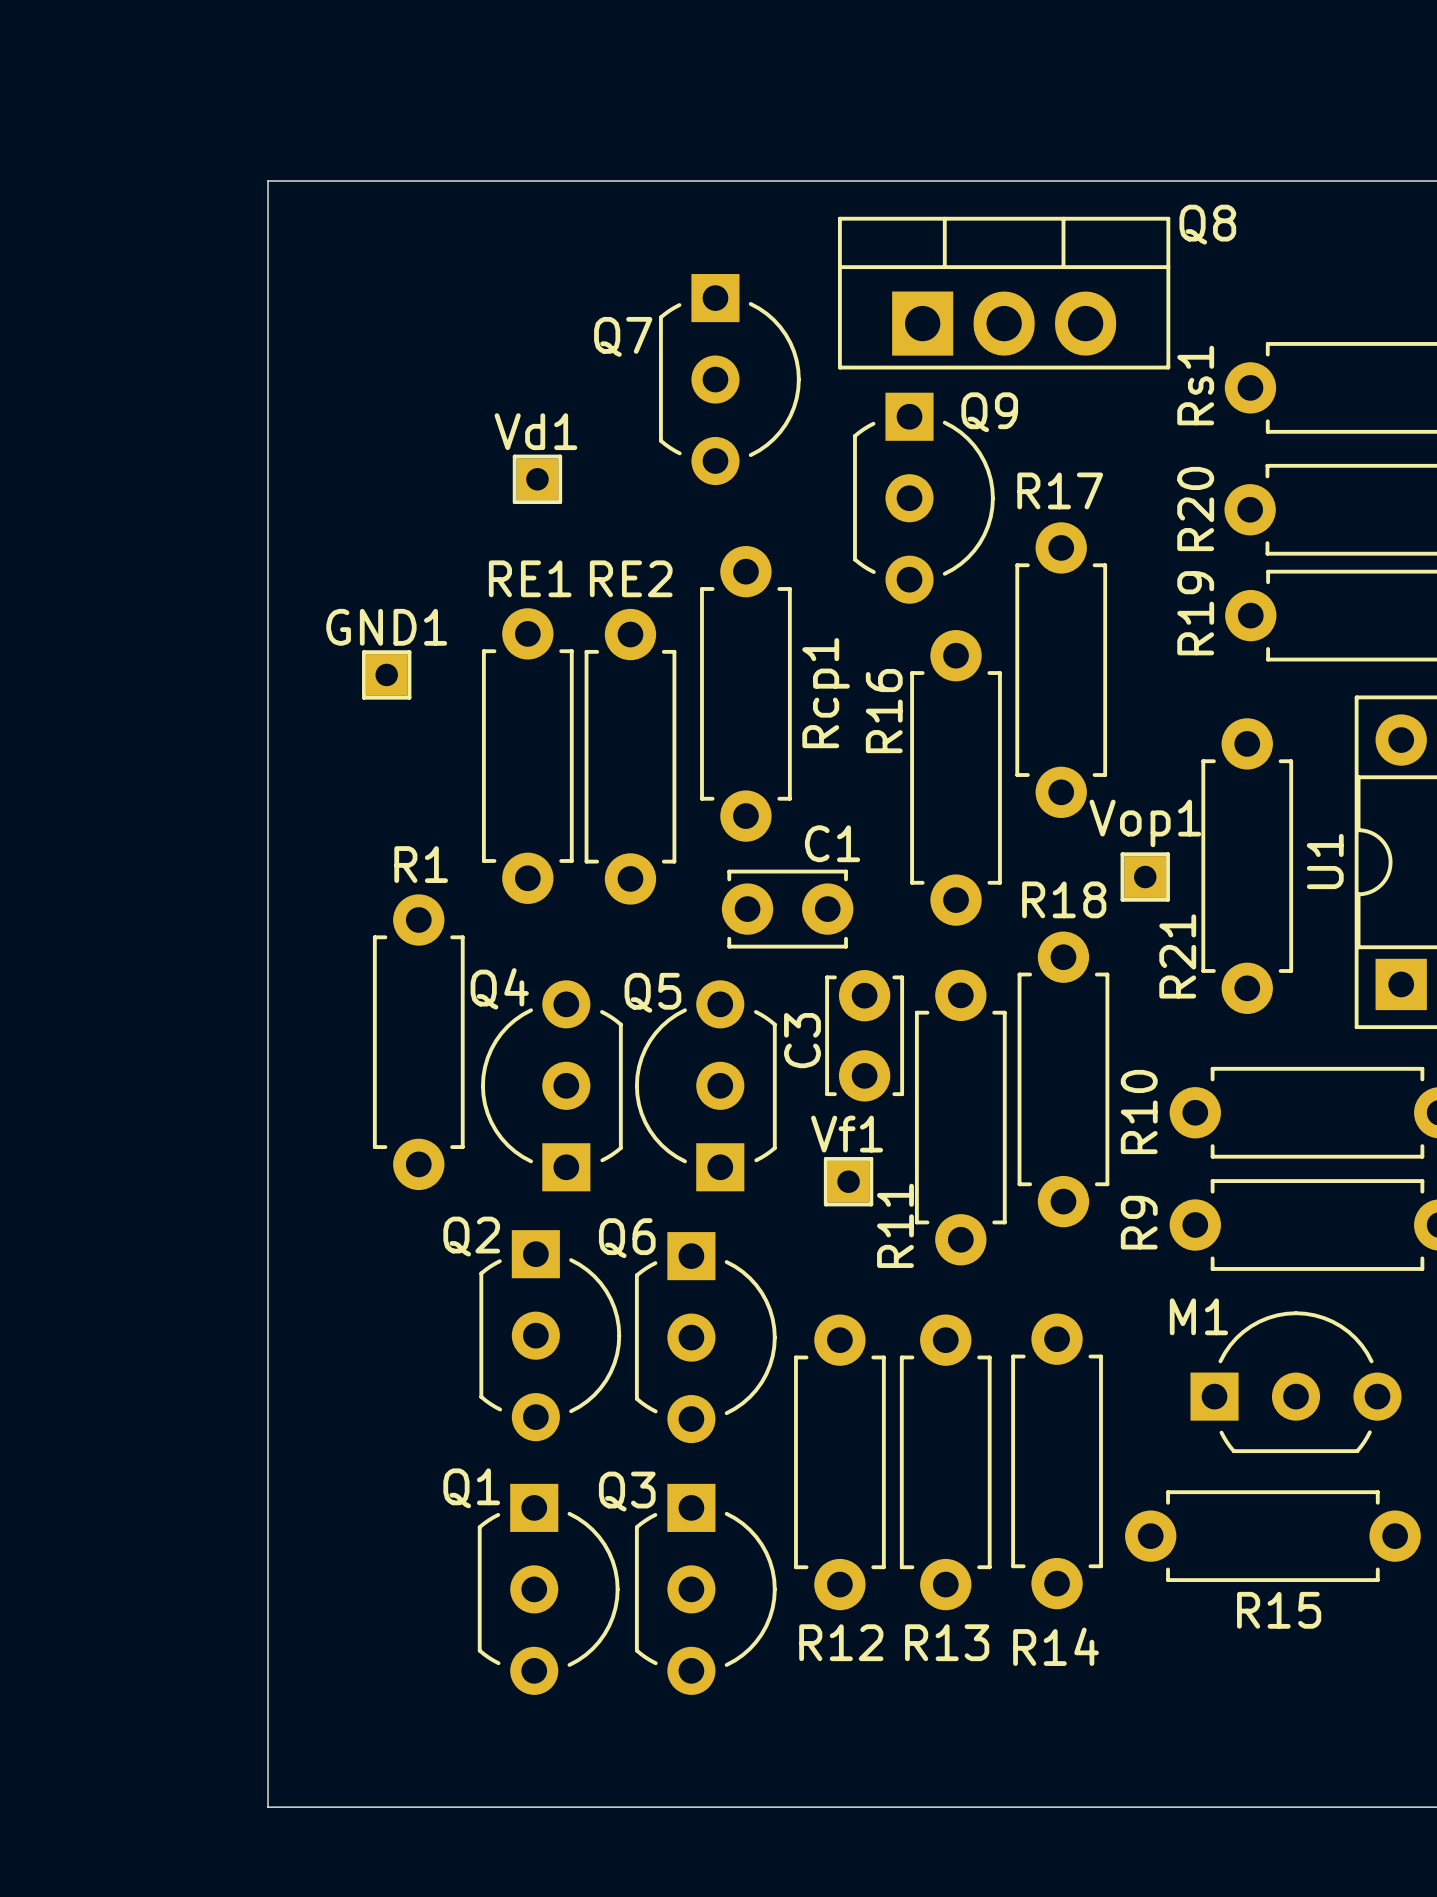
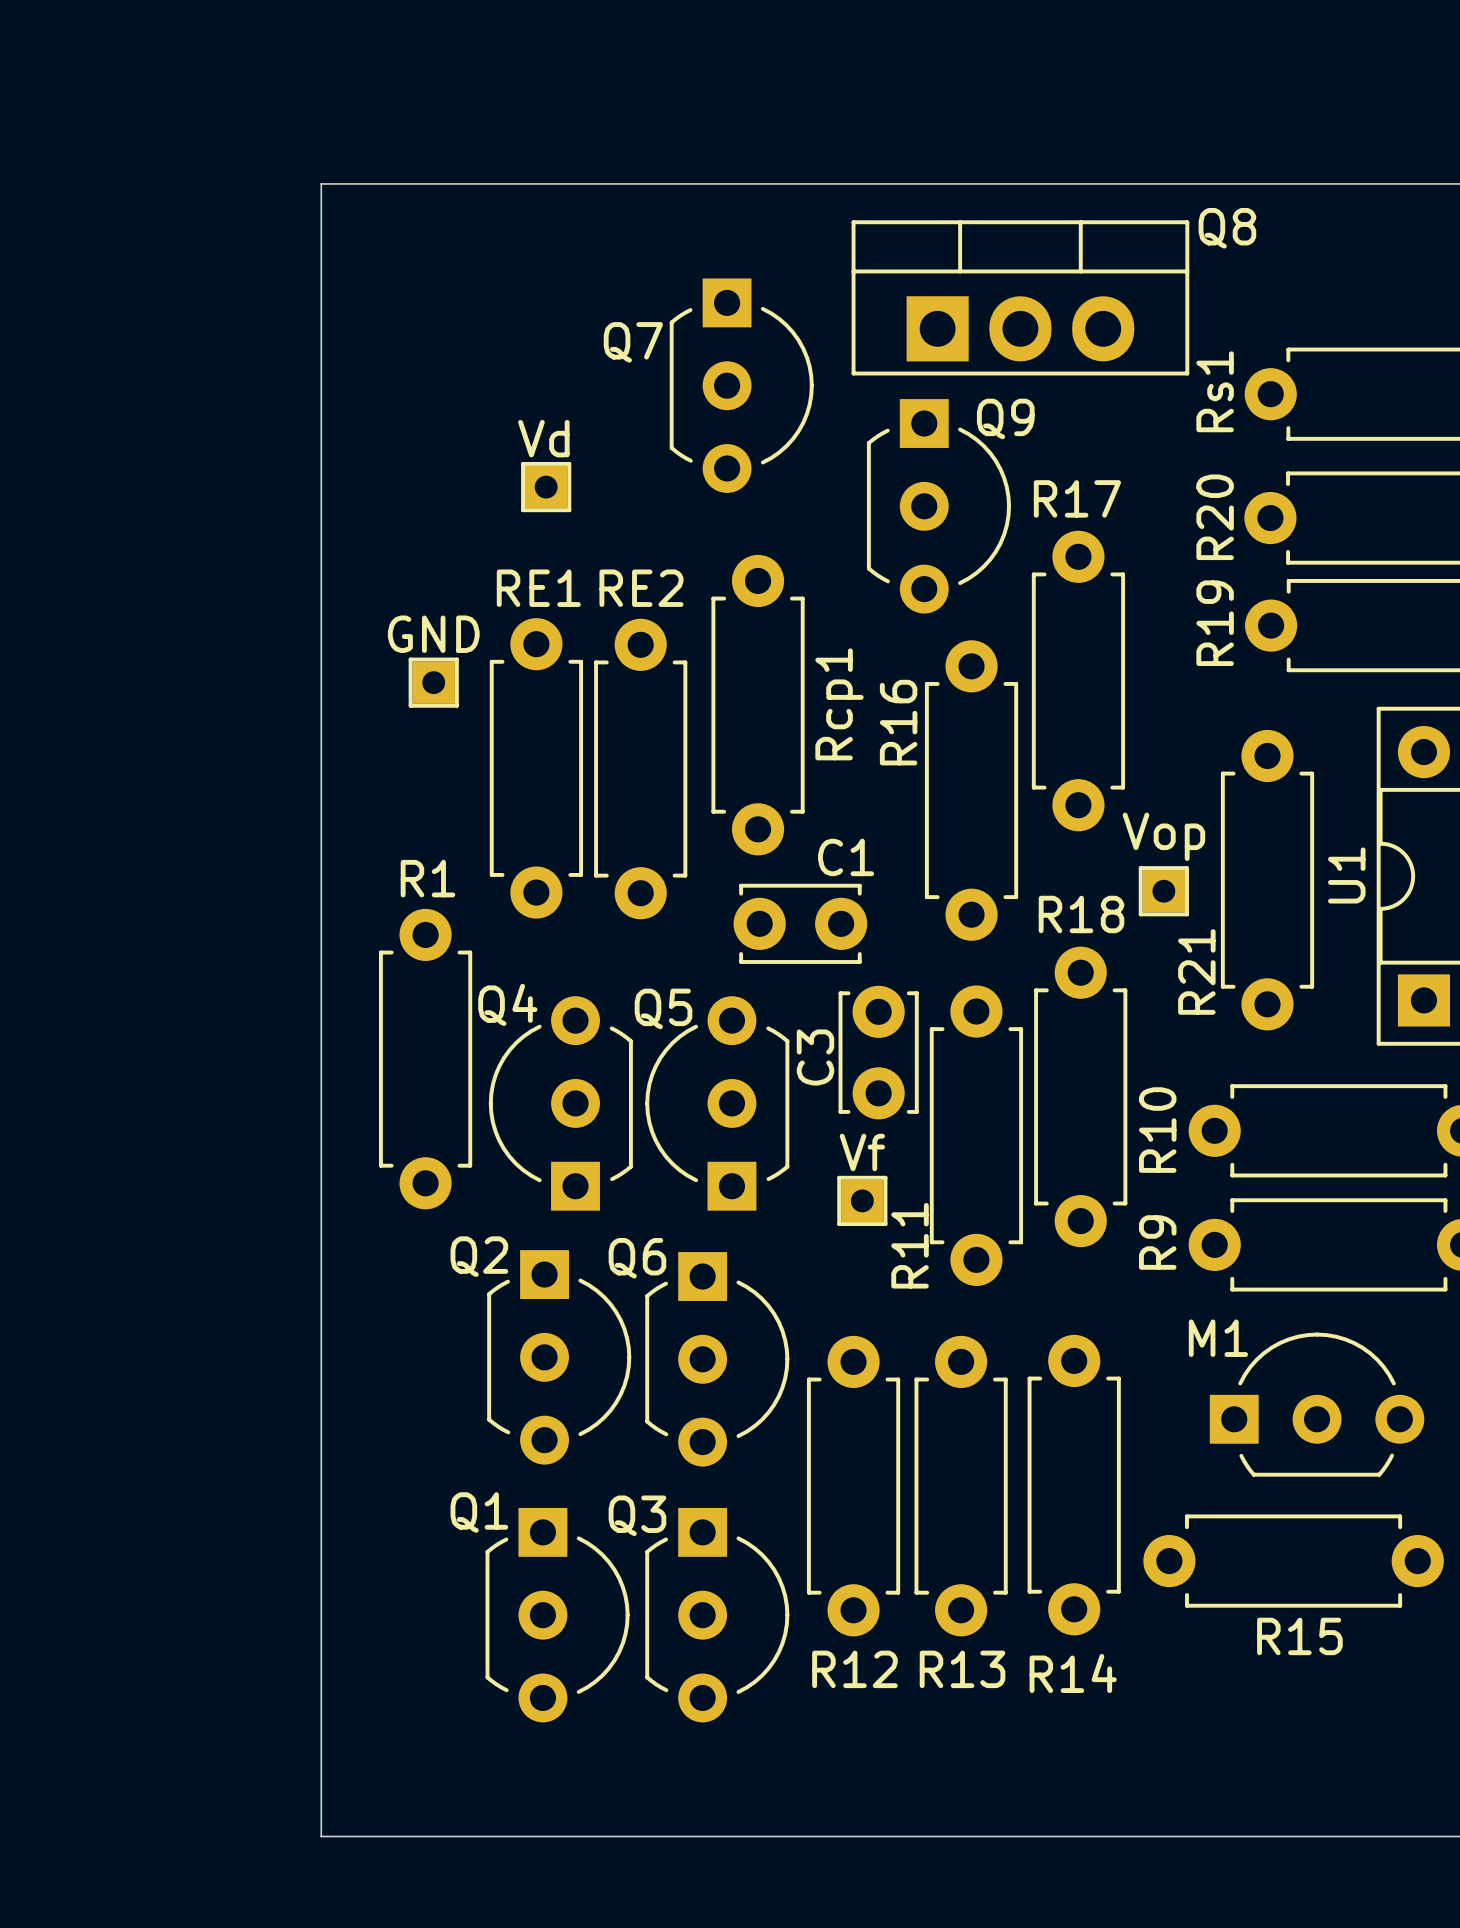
board edge: (316, 181) (268, 181) (268, 1807) (316, 1807) -> (321, 183) (321, 1836)
Vd1 name: Vd1 (535, 431) -> Vd (543, 438)
GND: none -> (433, 682)
GND1: (386, 674) -> none
Vop1 name: Vop1 (1145, 823) -> Vop (1163, 836)
Vf1 name: Vf1 (847, 1134) -> Vf (862, 1152)

